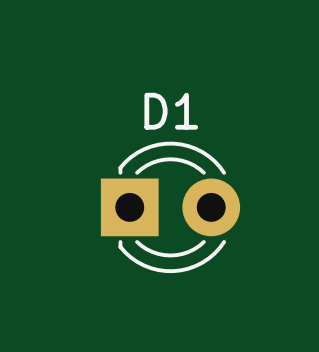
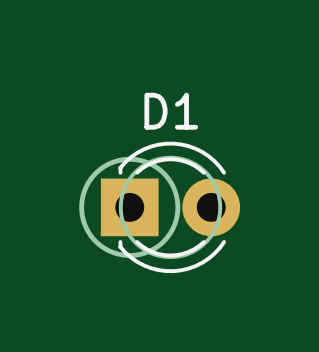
D1 footprint: [100, 141, 241, 274] -> [79, 141, 241, 274]
drawing: none -> [118, 155, 223, 260]

